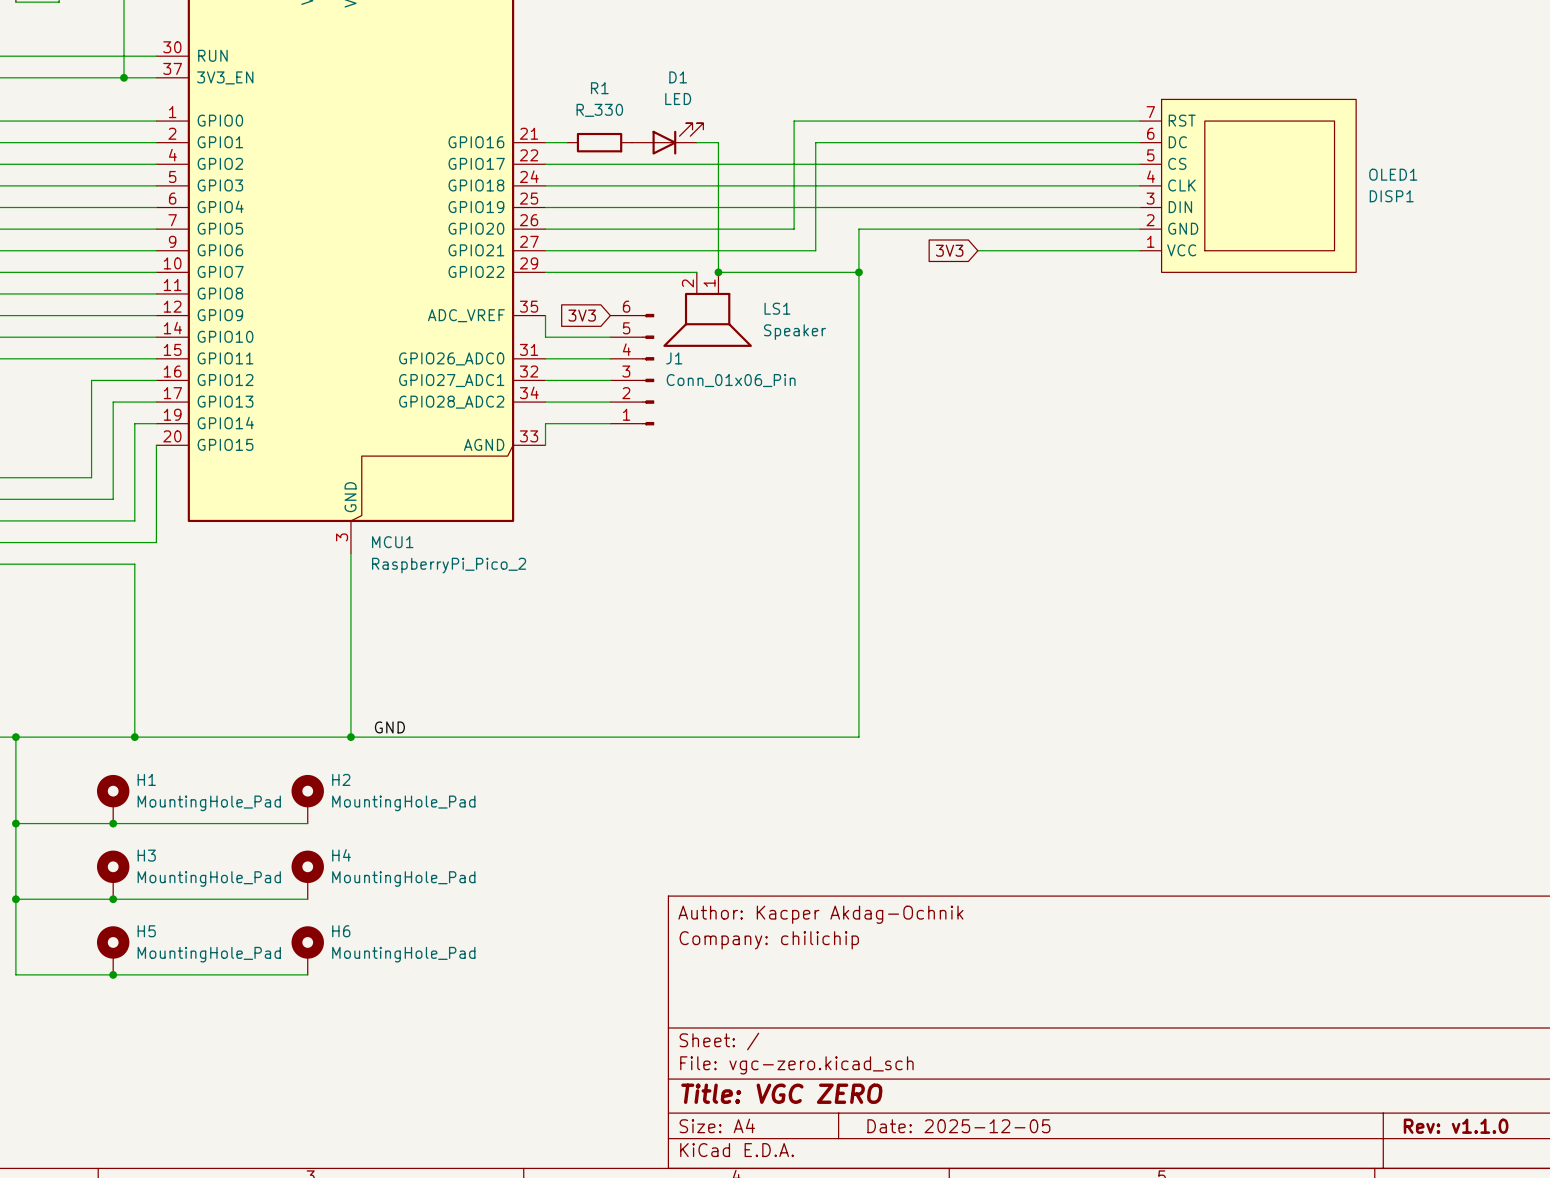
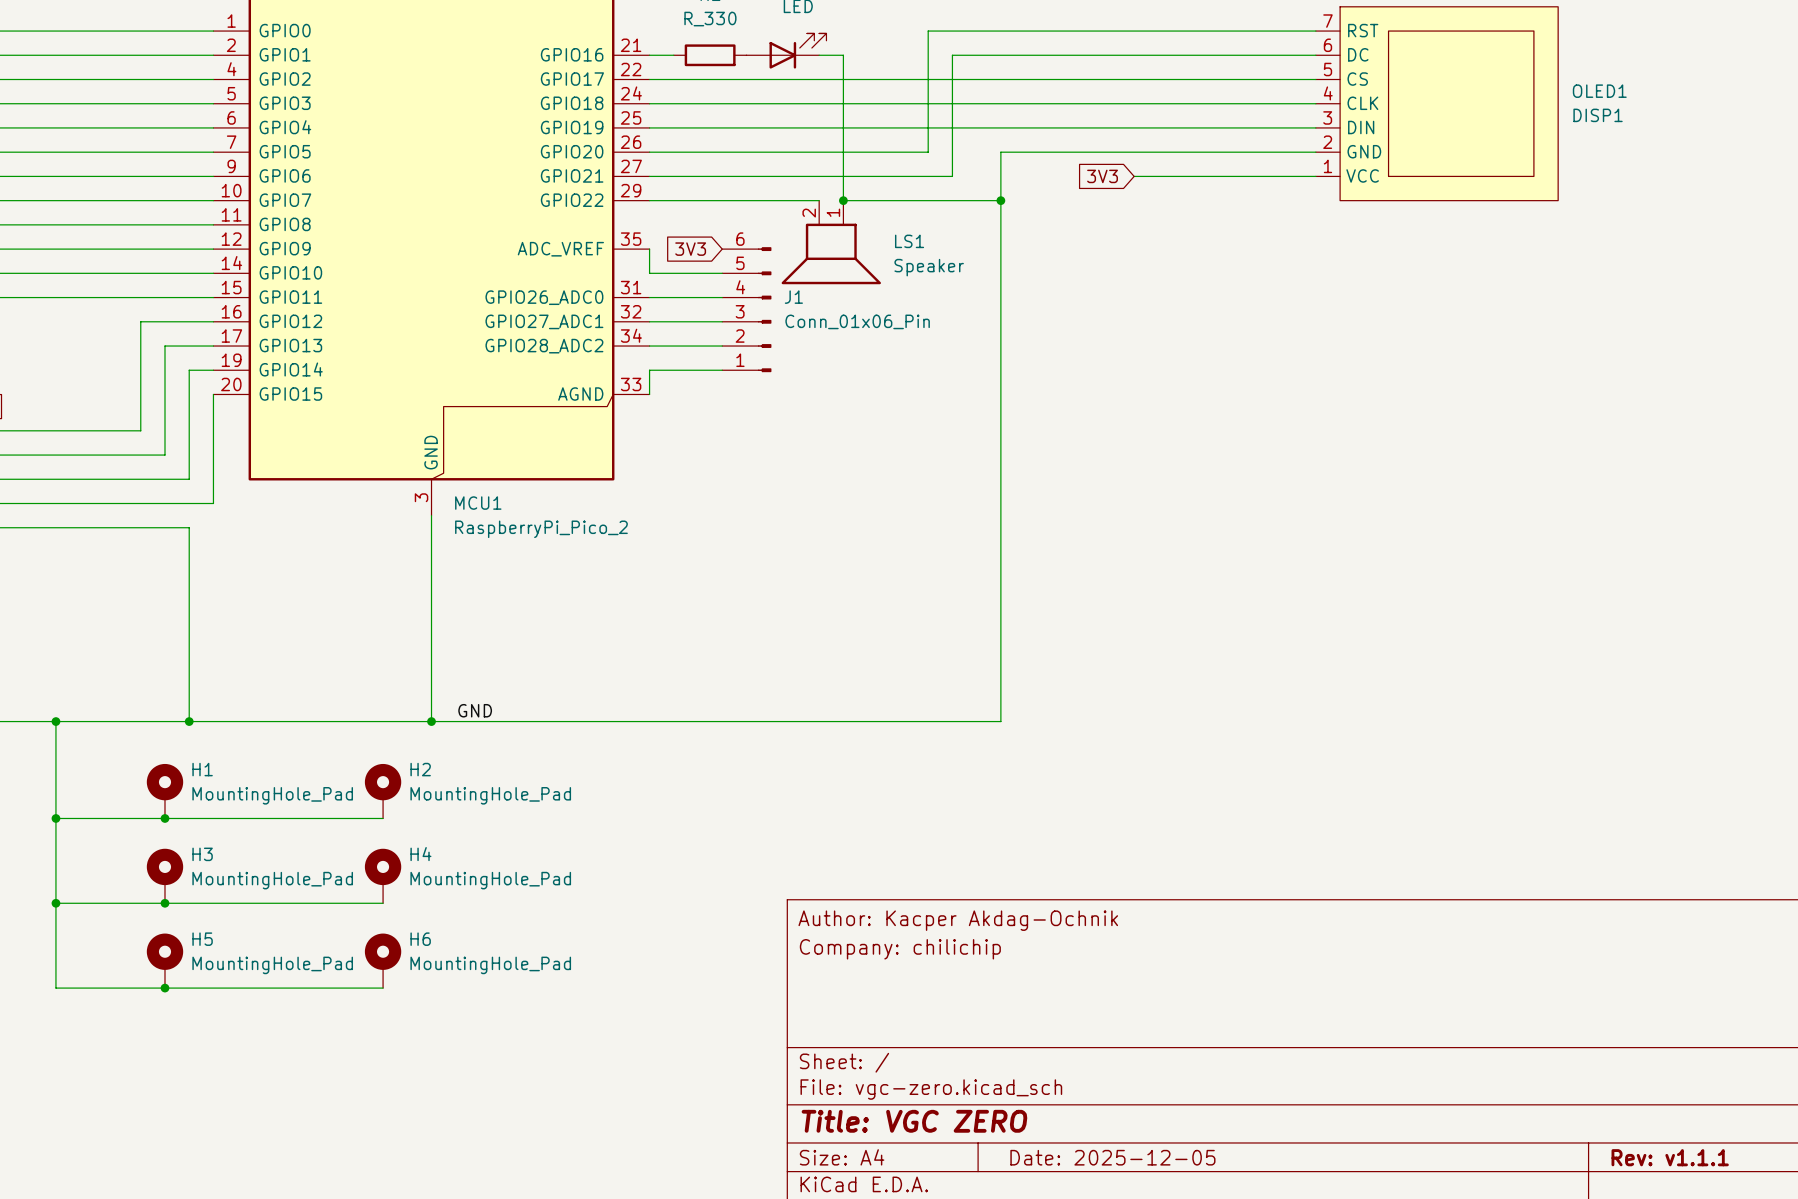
title block: Rev: v1.1.0 (1456, 1126) -> Rev: v1.1.1 (1670, 1157)

